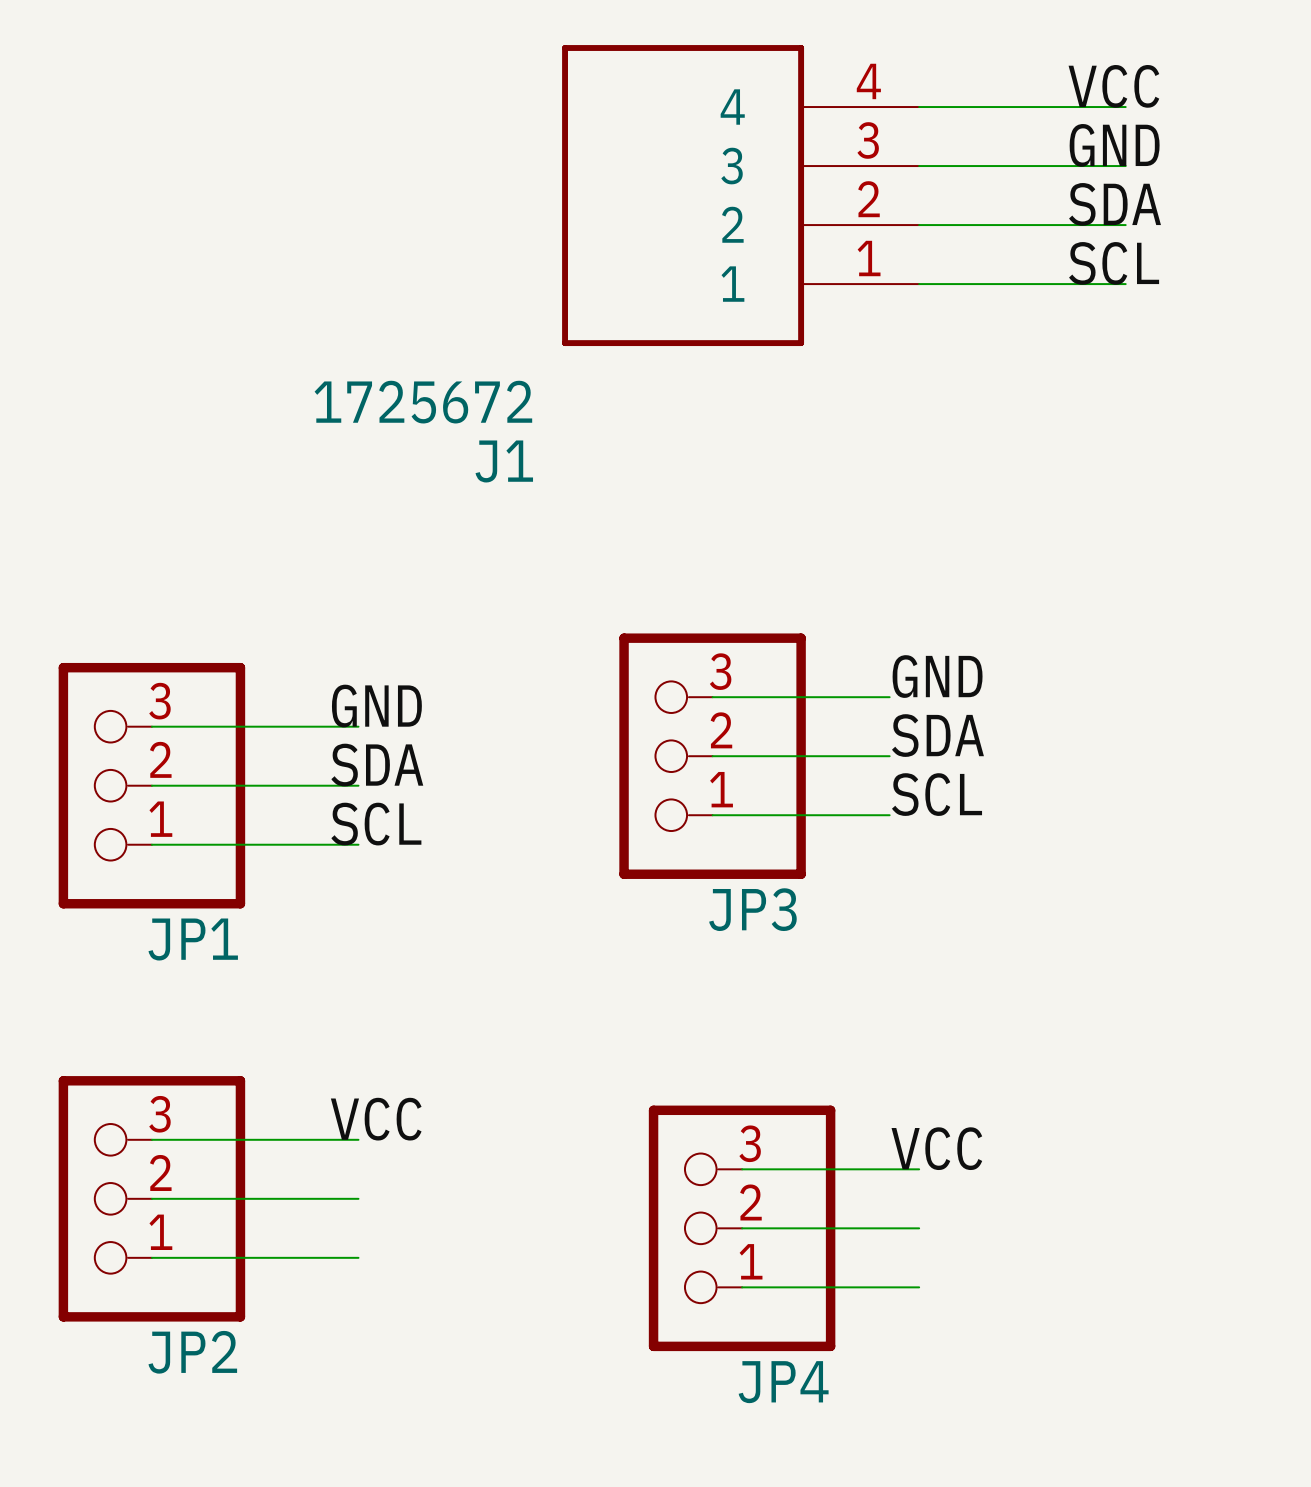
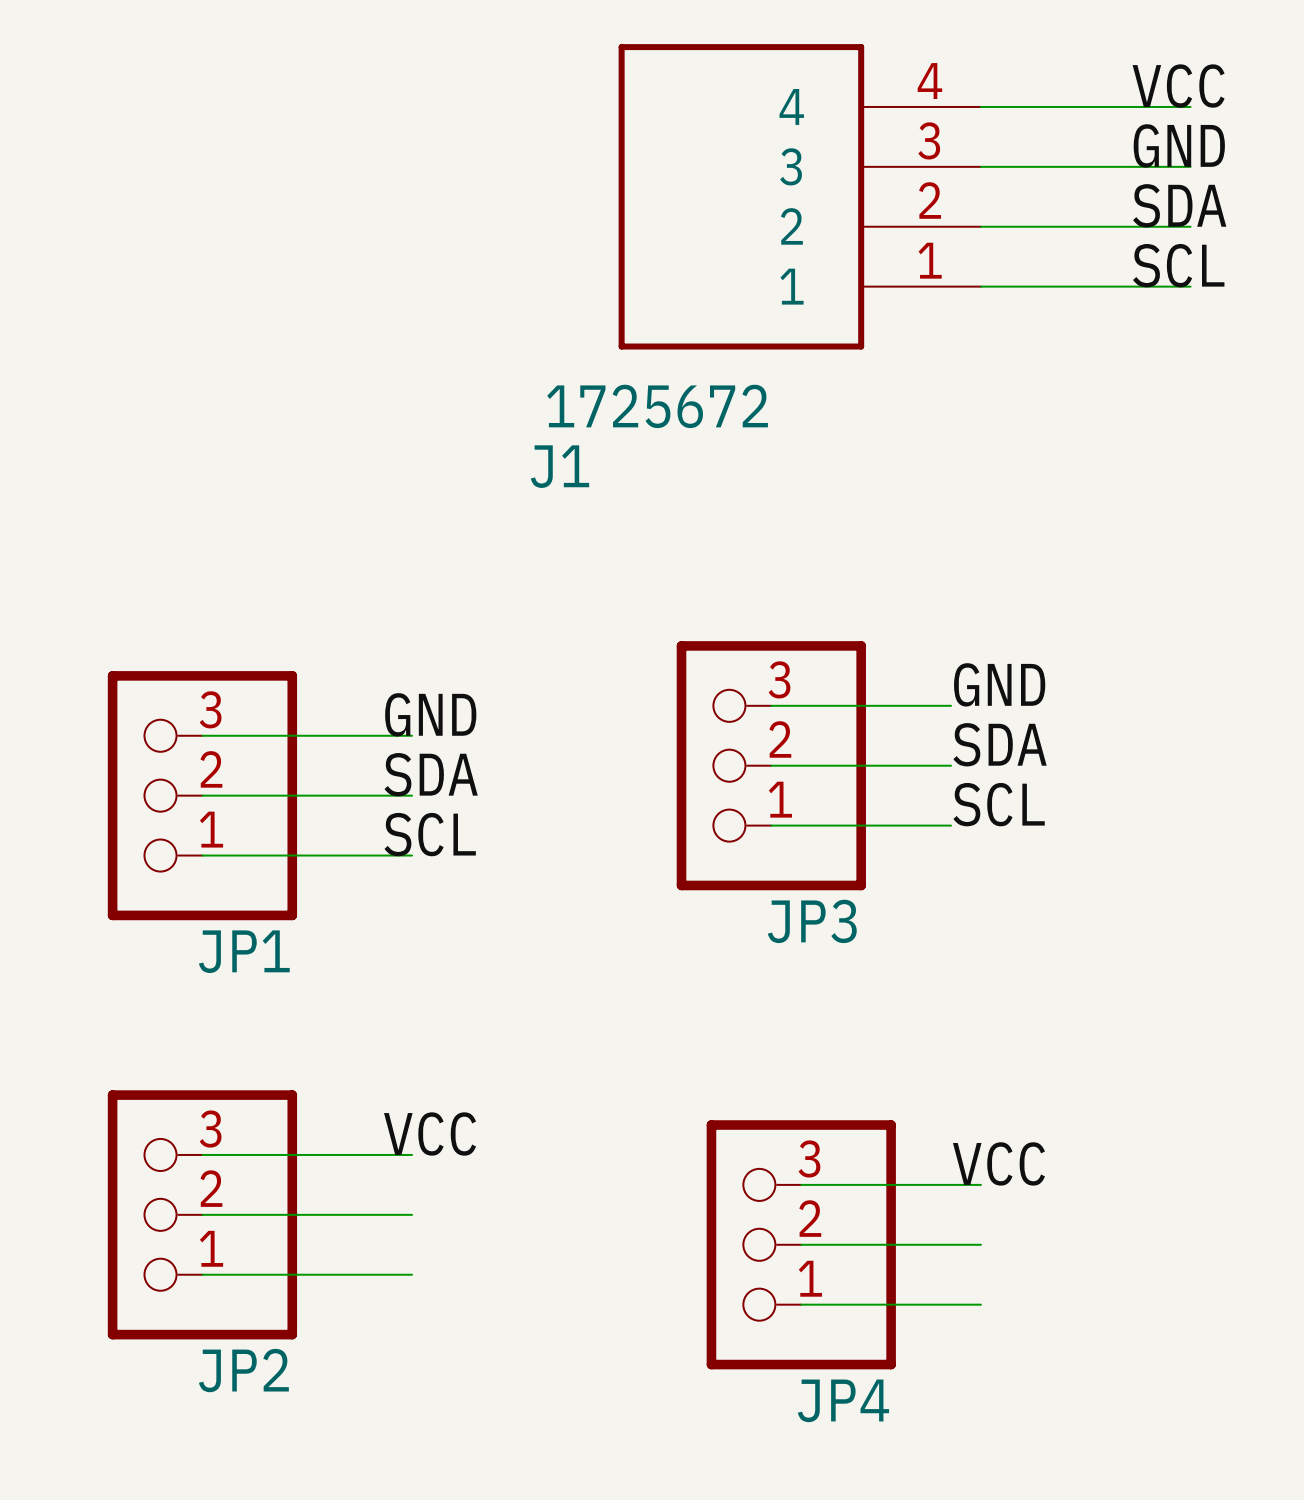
J1 value position: 1725672 (423, 402) -> 1725672 (657, 406)

